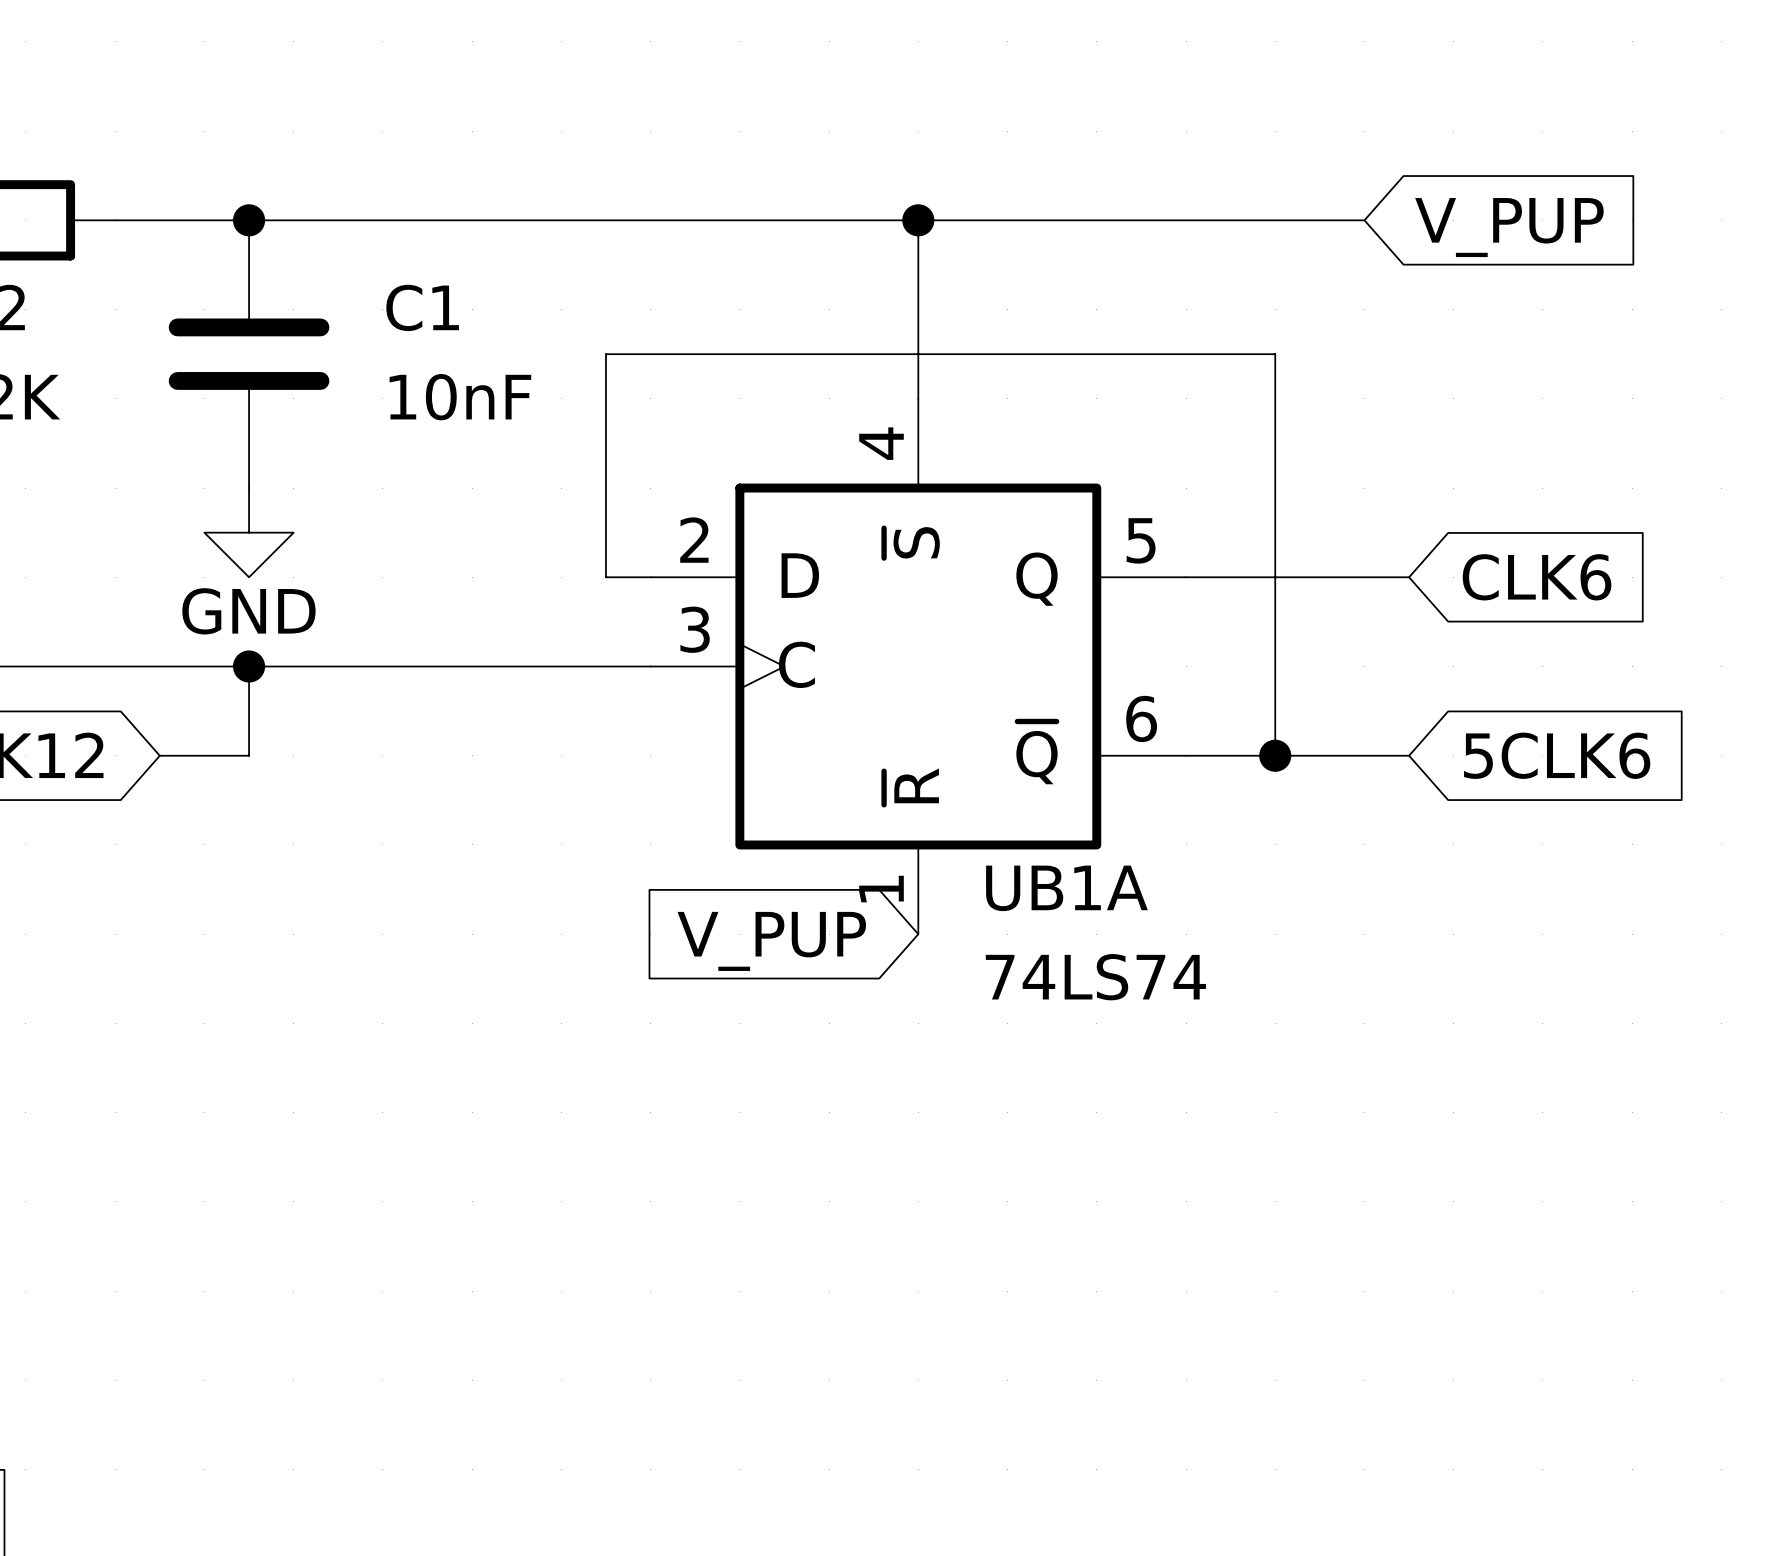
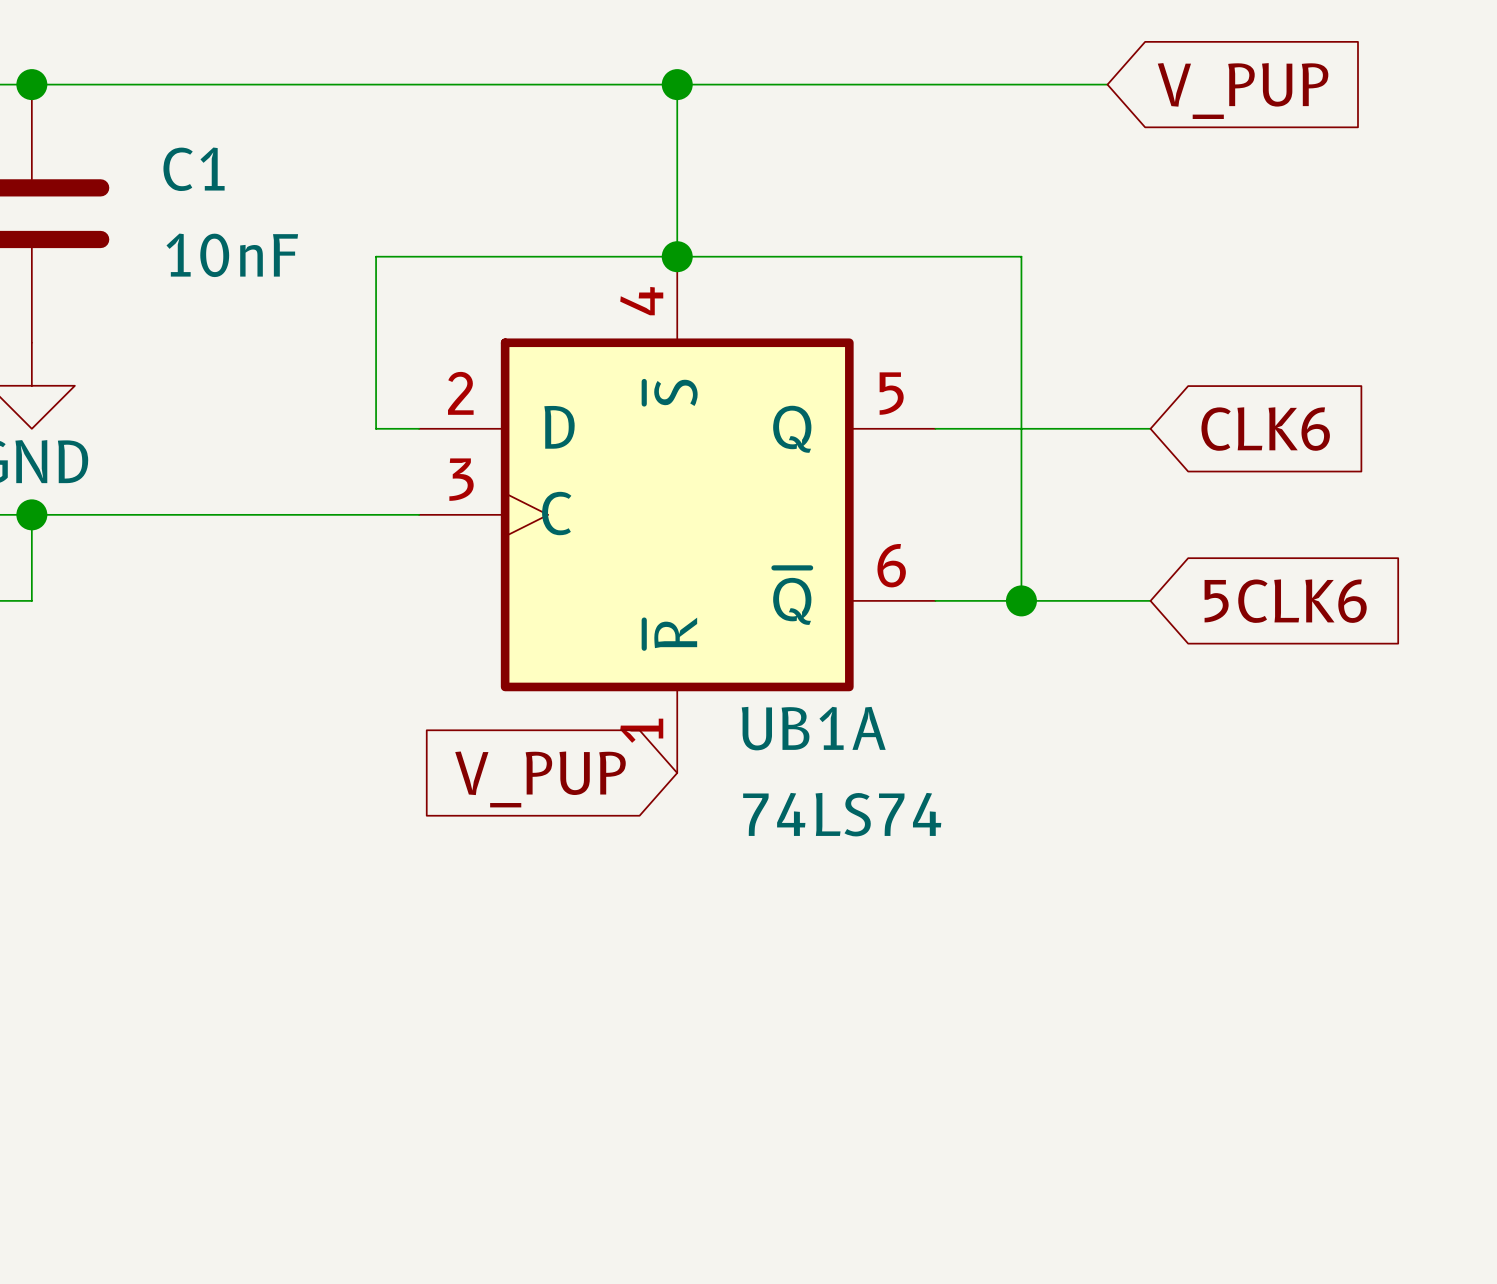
wire: (605, 398) (605, 354) (1275, 354) (1275, 398) -> (376, 256) (1021, 256)
junction: none -> (677, 256)

